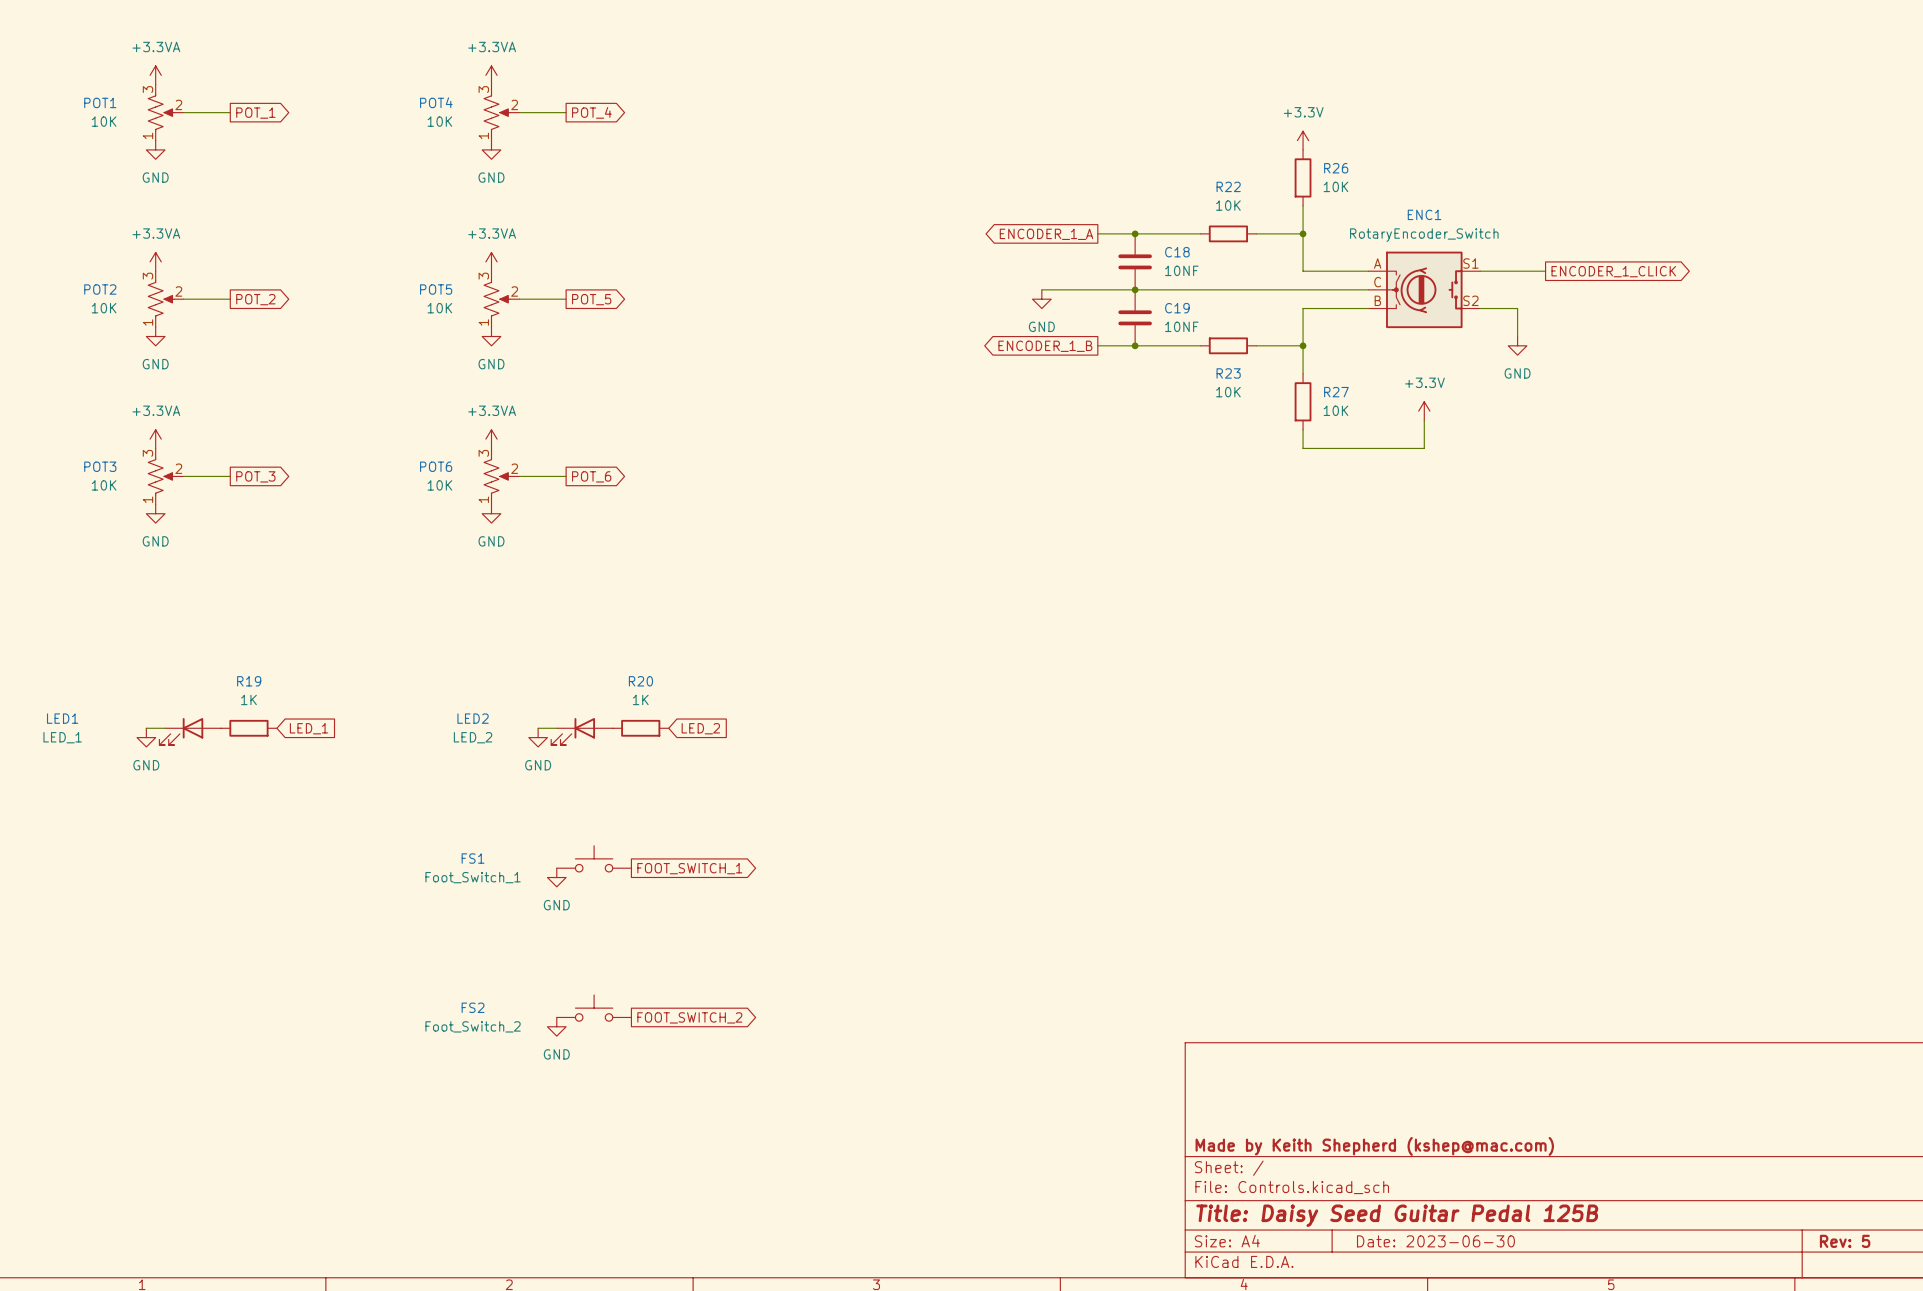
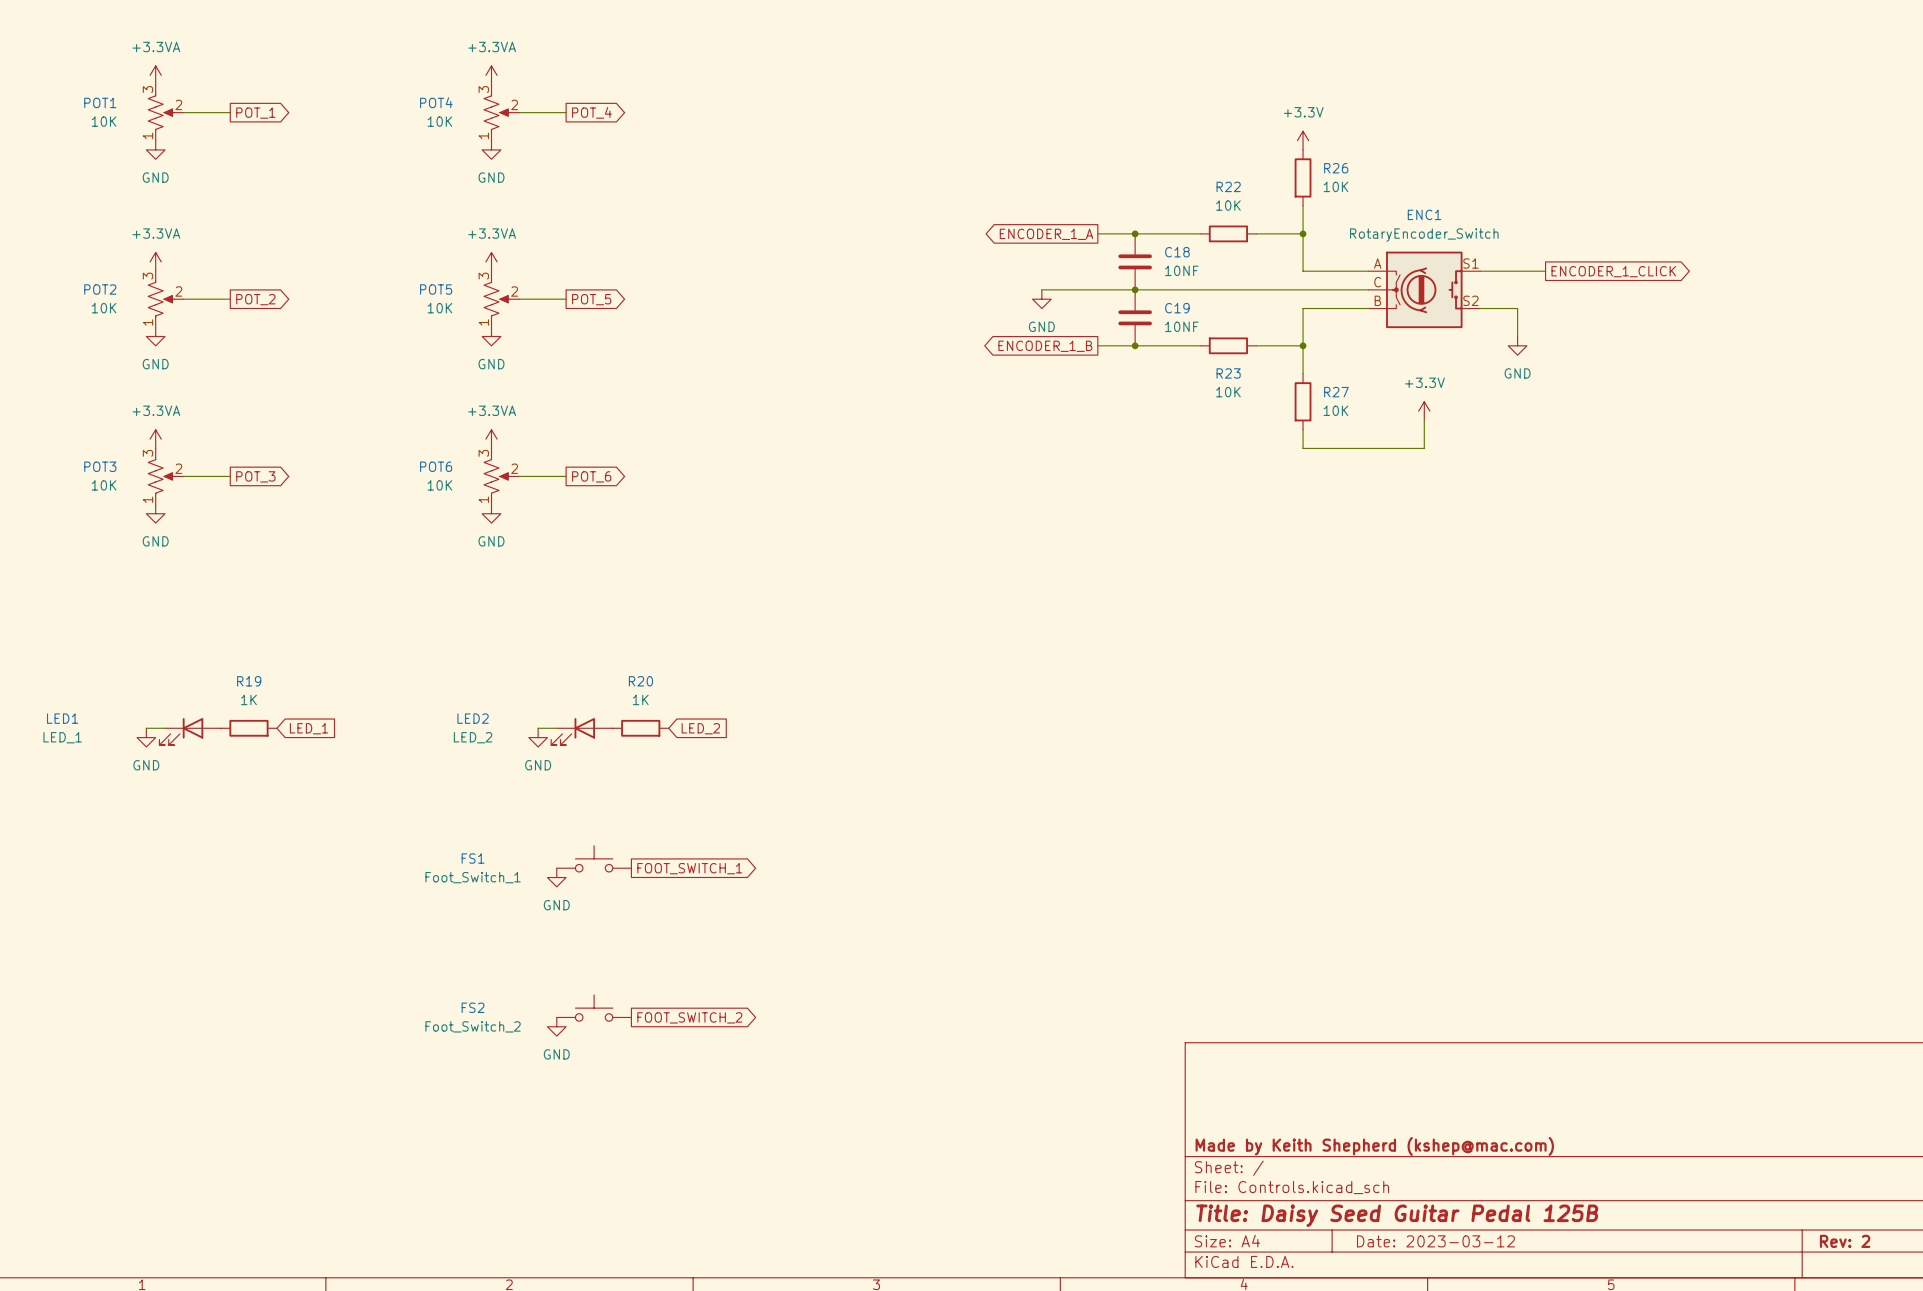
title block: Date: 2023-06-30 (1435, 1241) -> Date: 2023-03-12 (1435, 1241)
title block: Rev: 5 (1845, 1241) -> Rev: 2 (1845, 1241)

